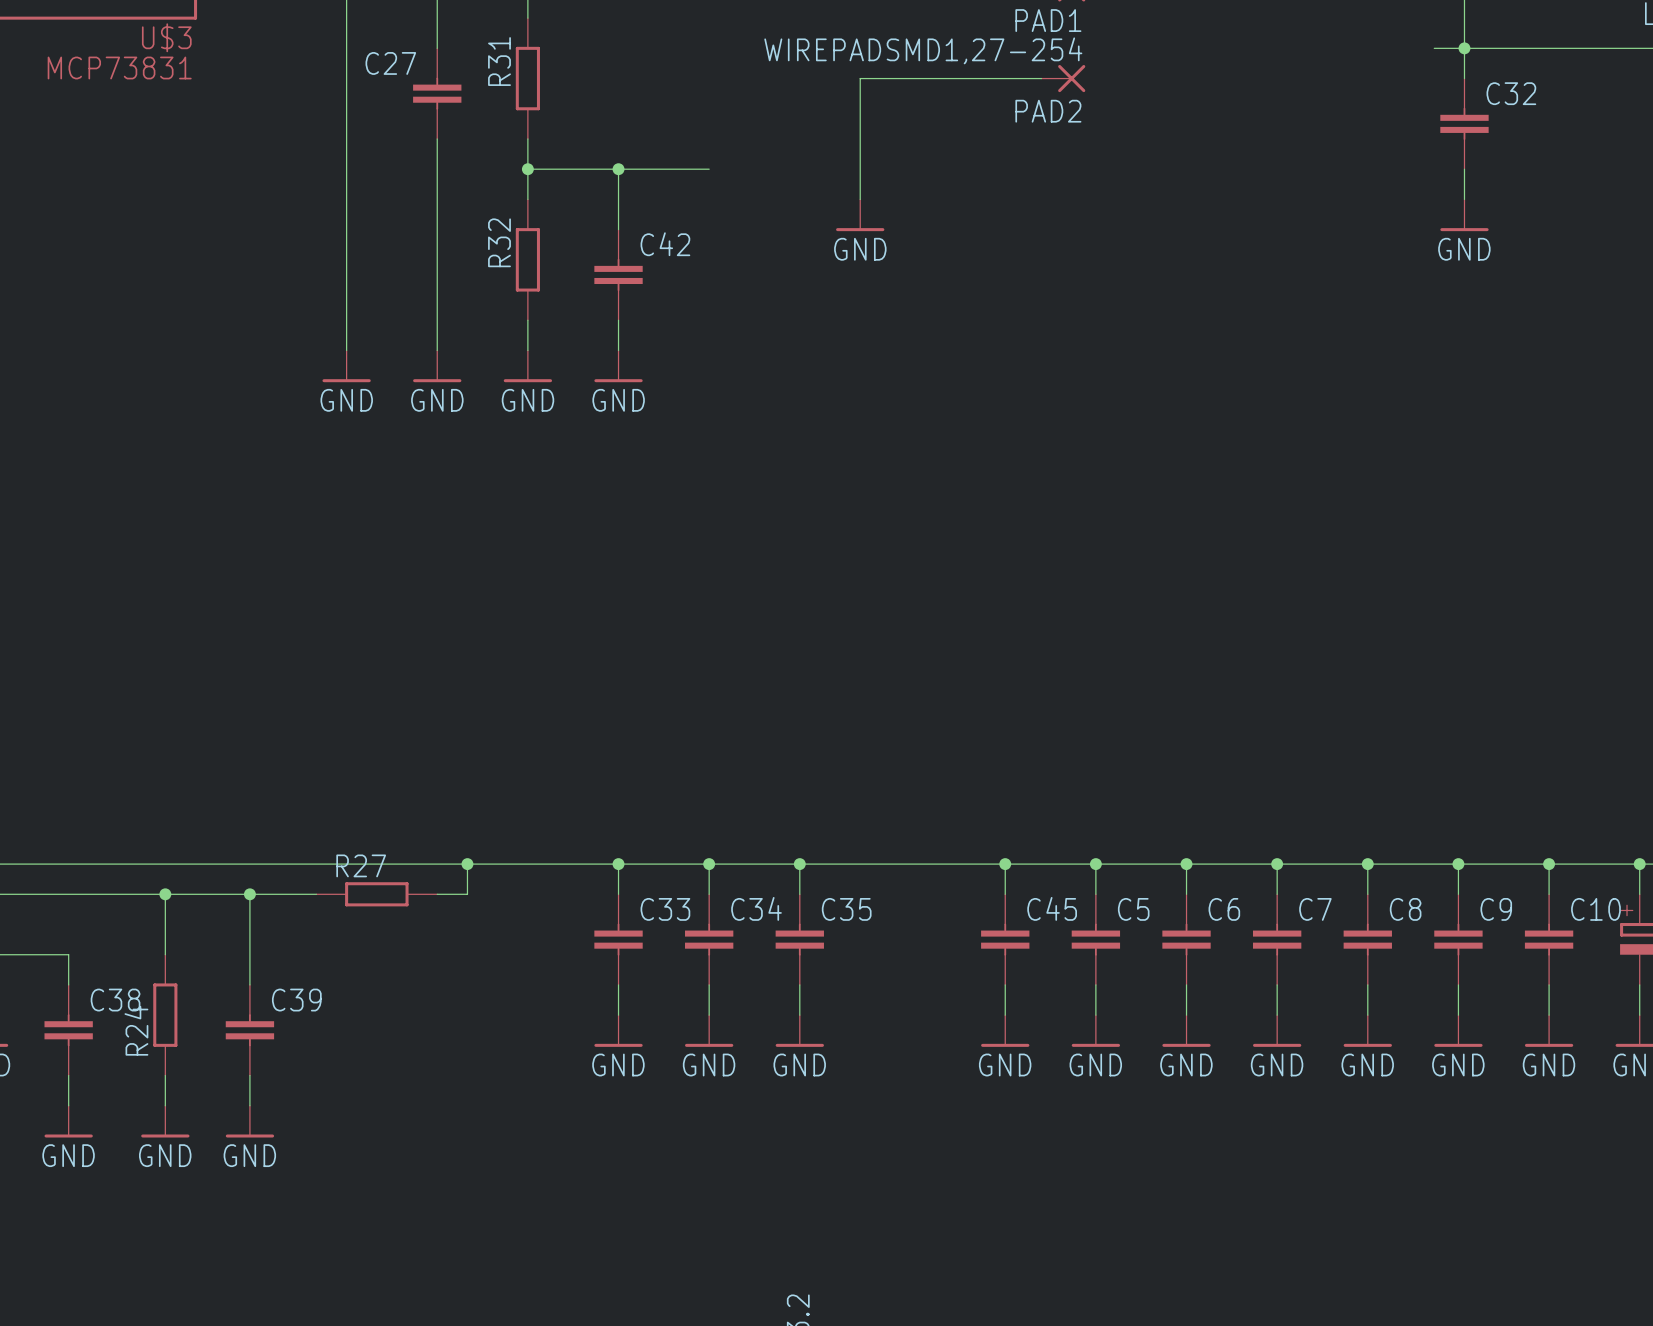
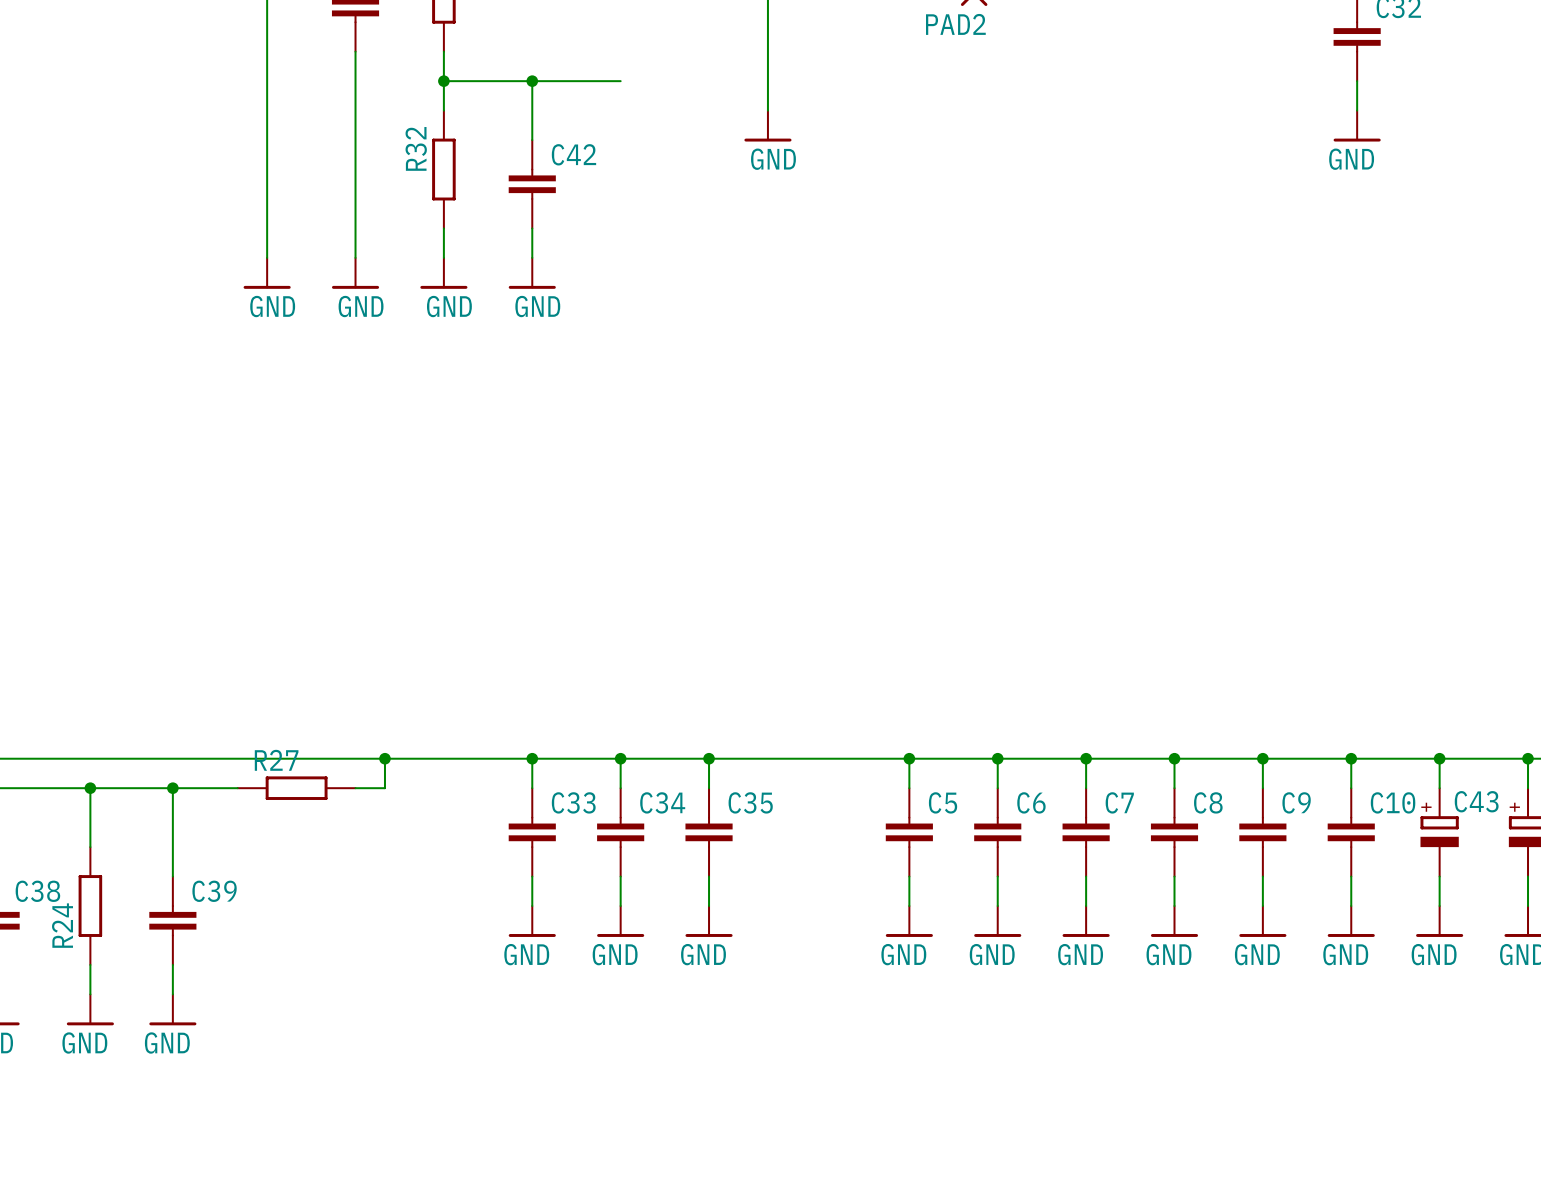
C45 name: C45 (1052, 908) -> C5 (943, 802)
C5 name: C5 (1133, 909) -> C6 (1031, 802)
C6 name: C6 (1224, 909) -> C7 (1119, 802)
C7 name: C7 (1315, 909) -> C8 (1208, 802)
C8 name: C8 (1405, 909) -> C9 (1296, 802)
C9 name: C9 (1496, 909) -> C10 (1393, 802)
C10: (1549, 939) -> none
C43: none -> (1439, 832)

